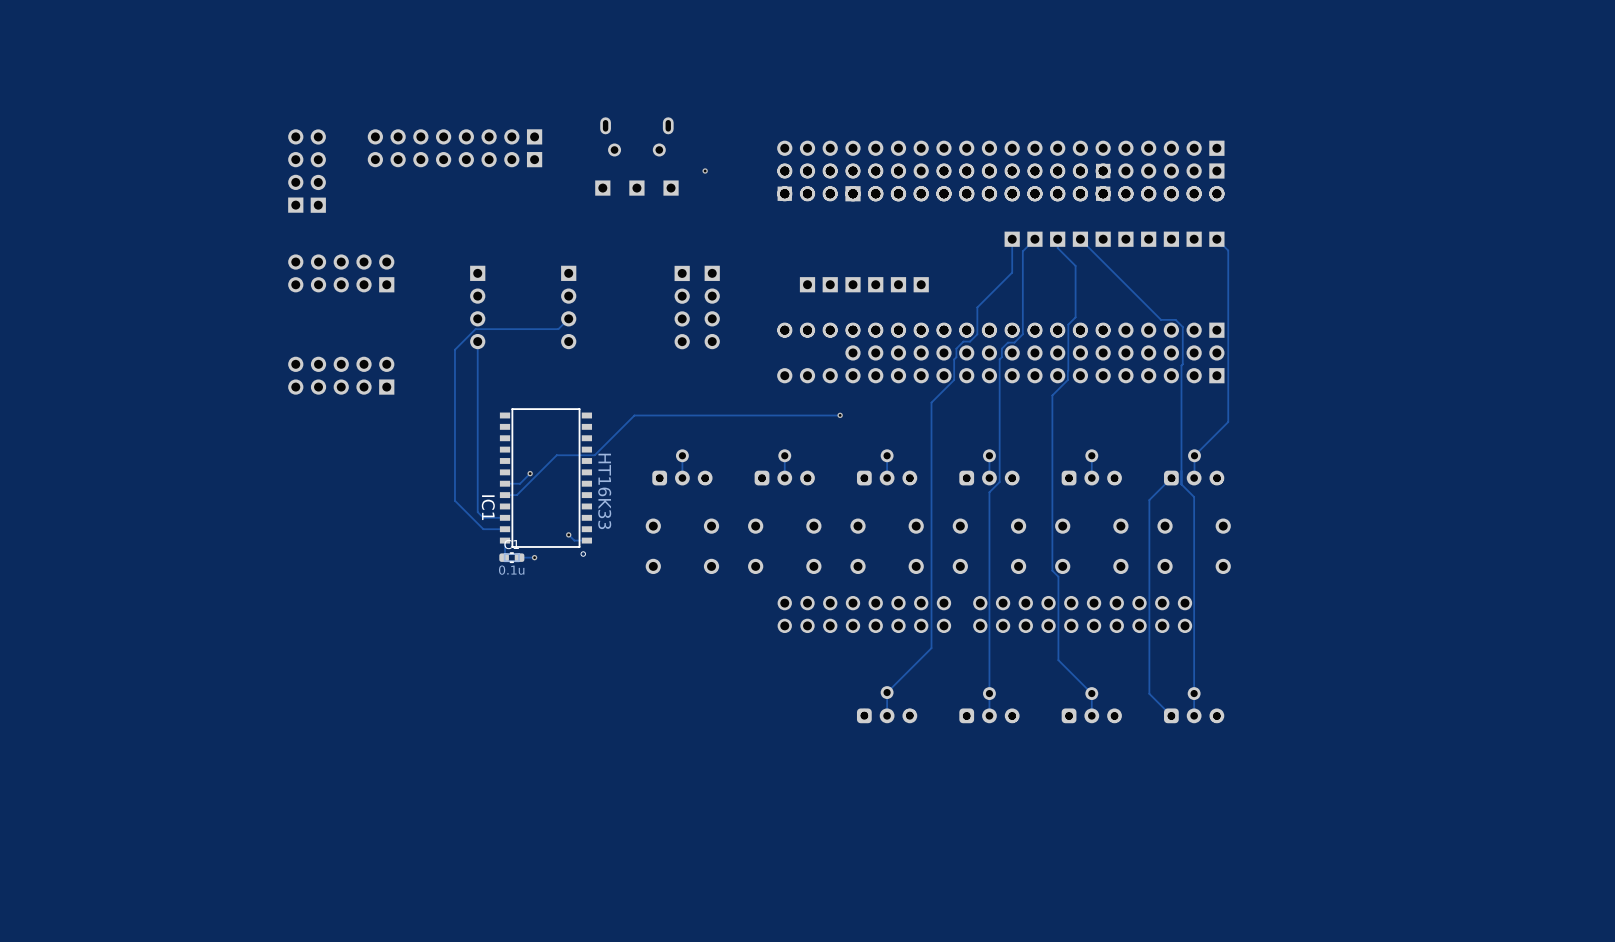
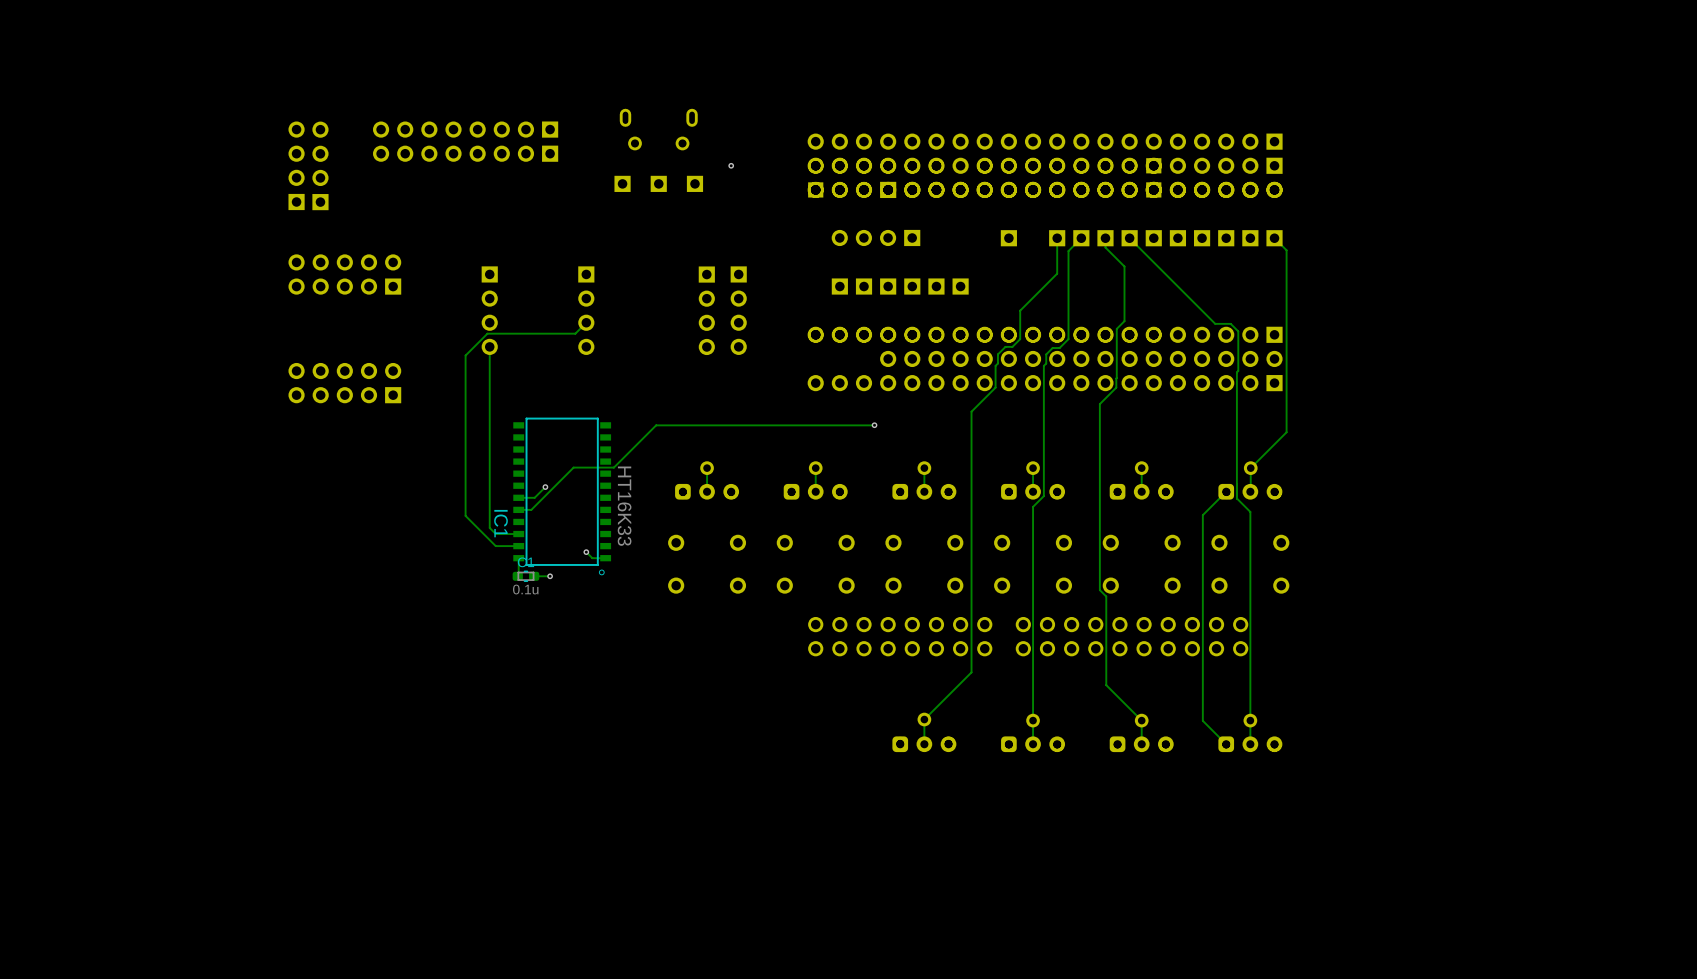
part: none -> (875, 237)
part: none -> (1008, 238)

